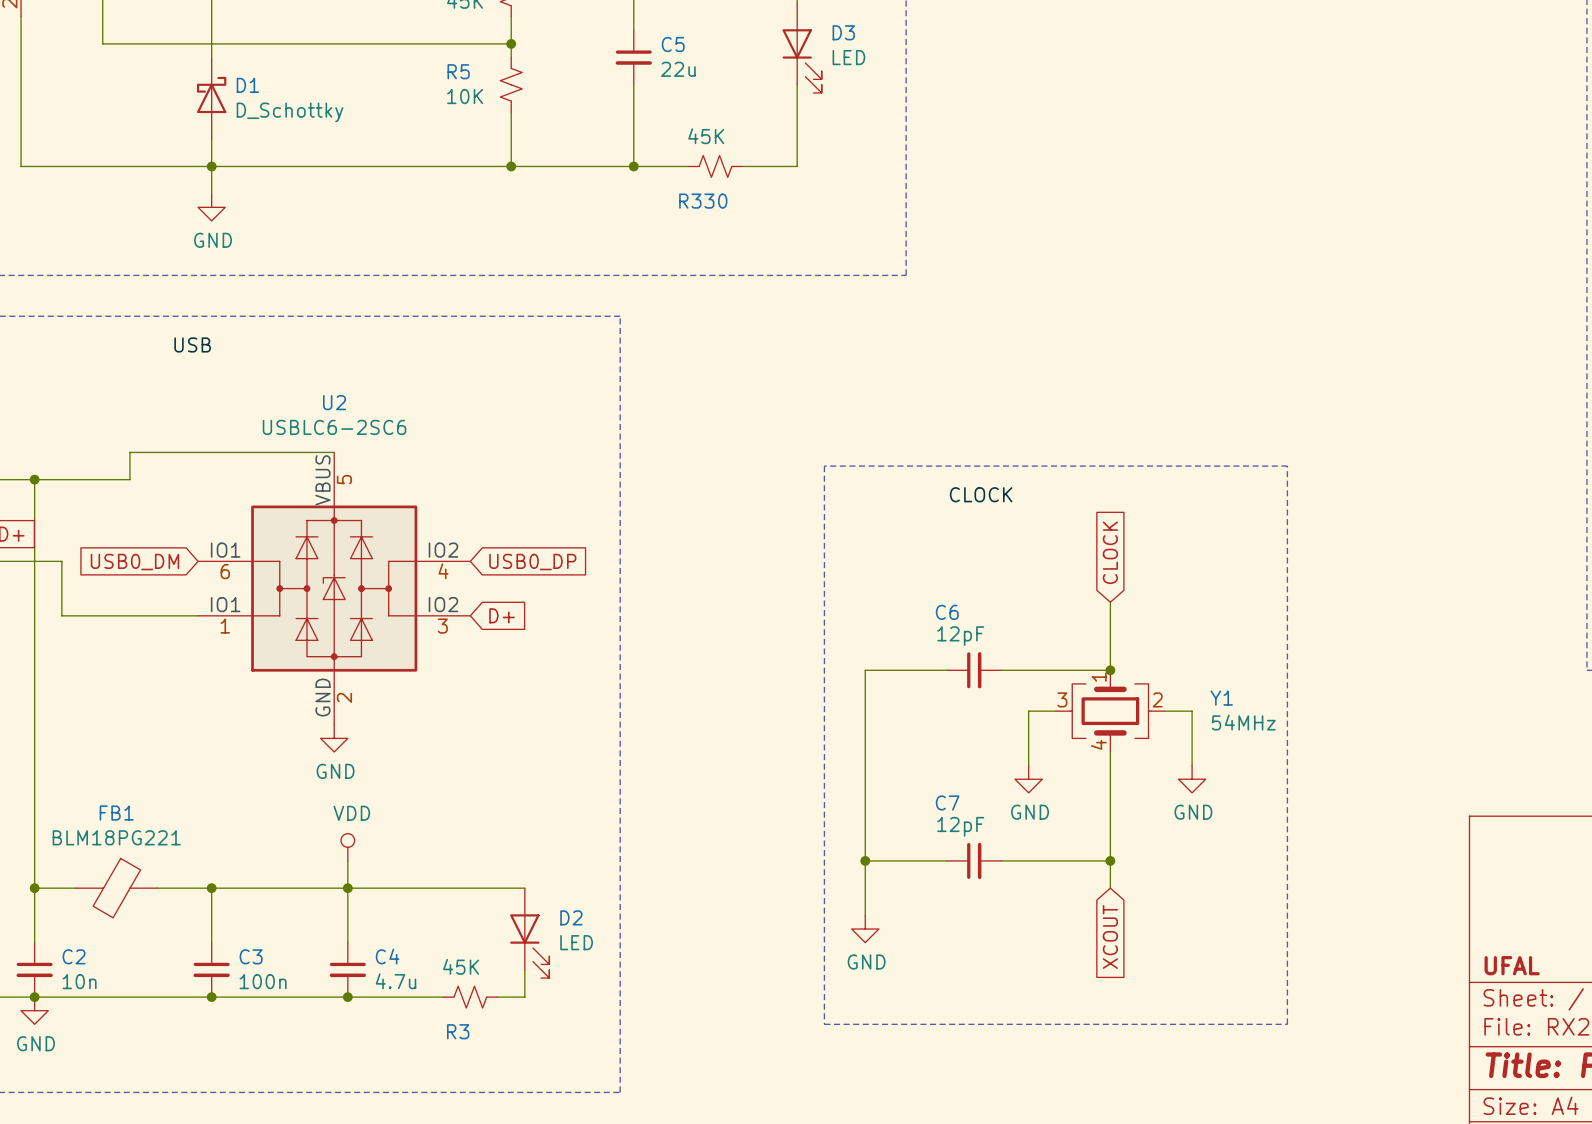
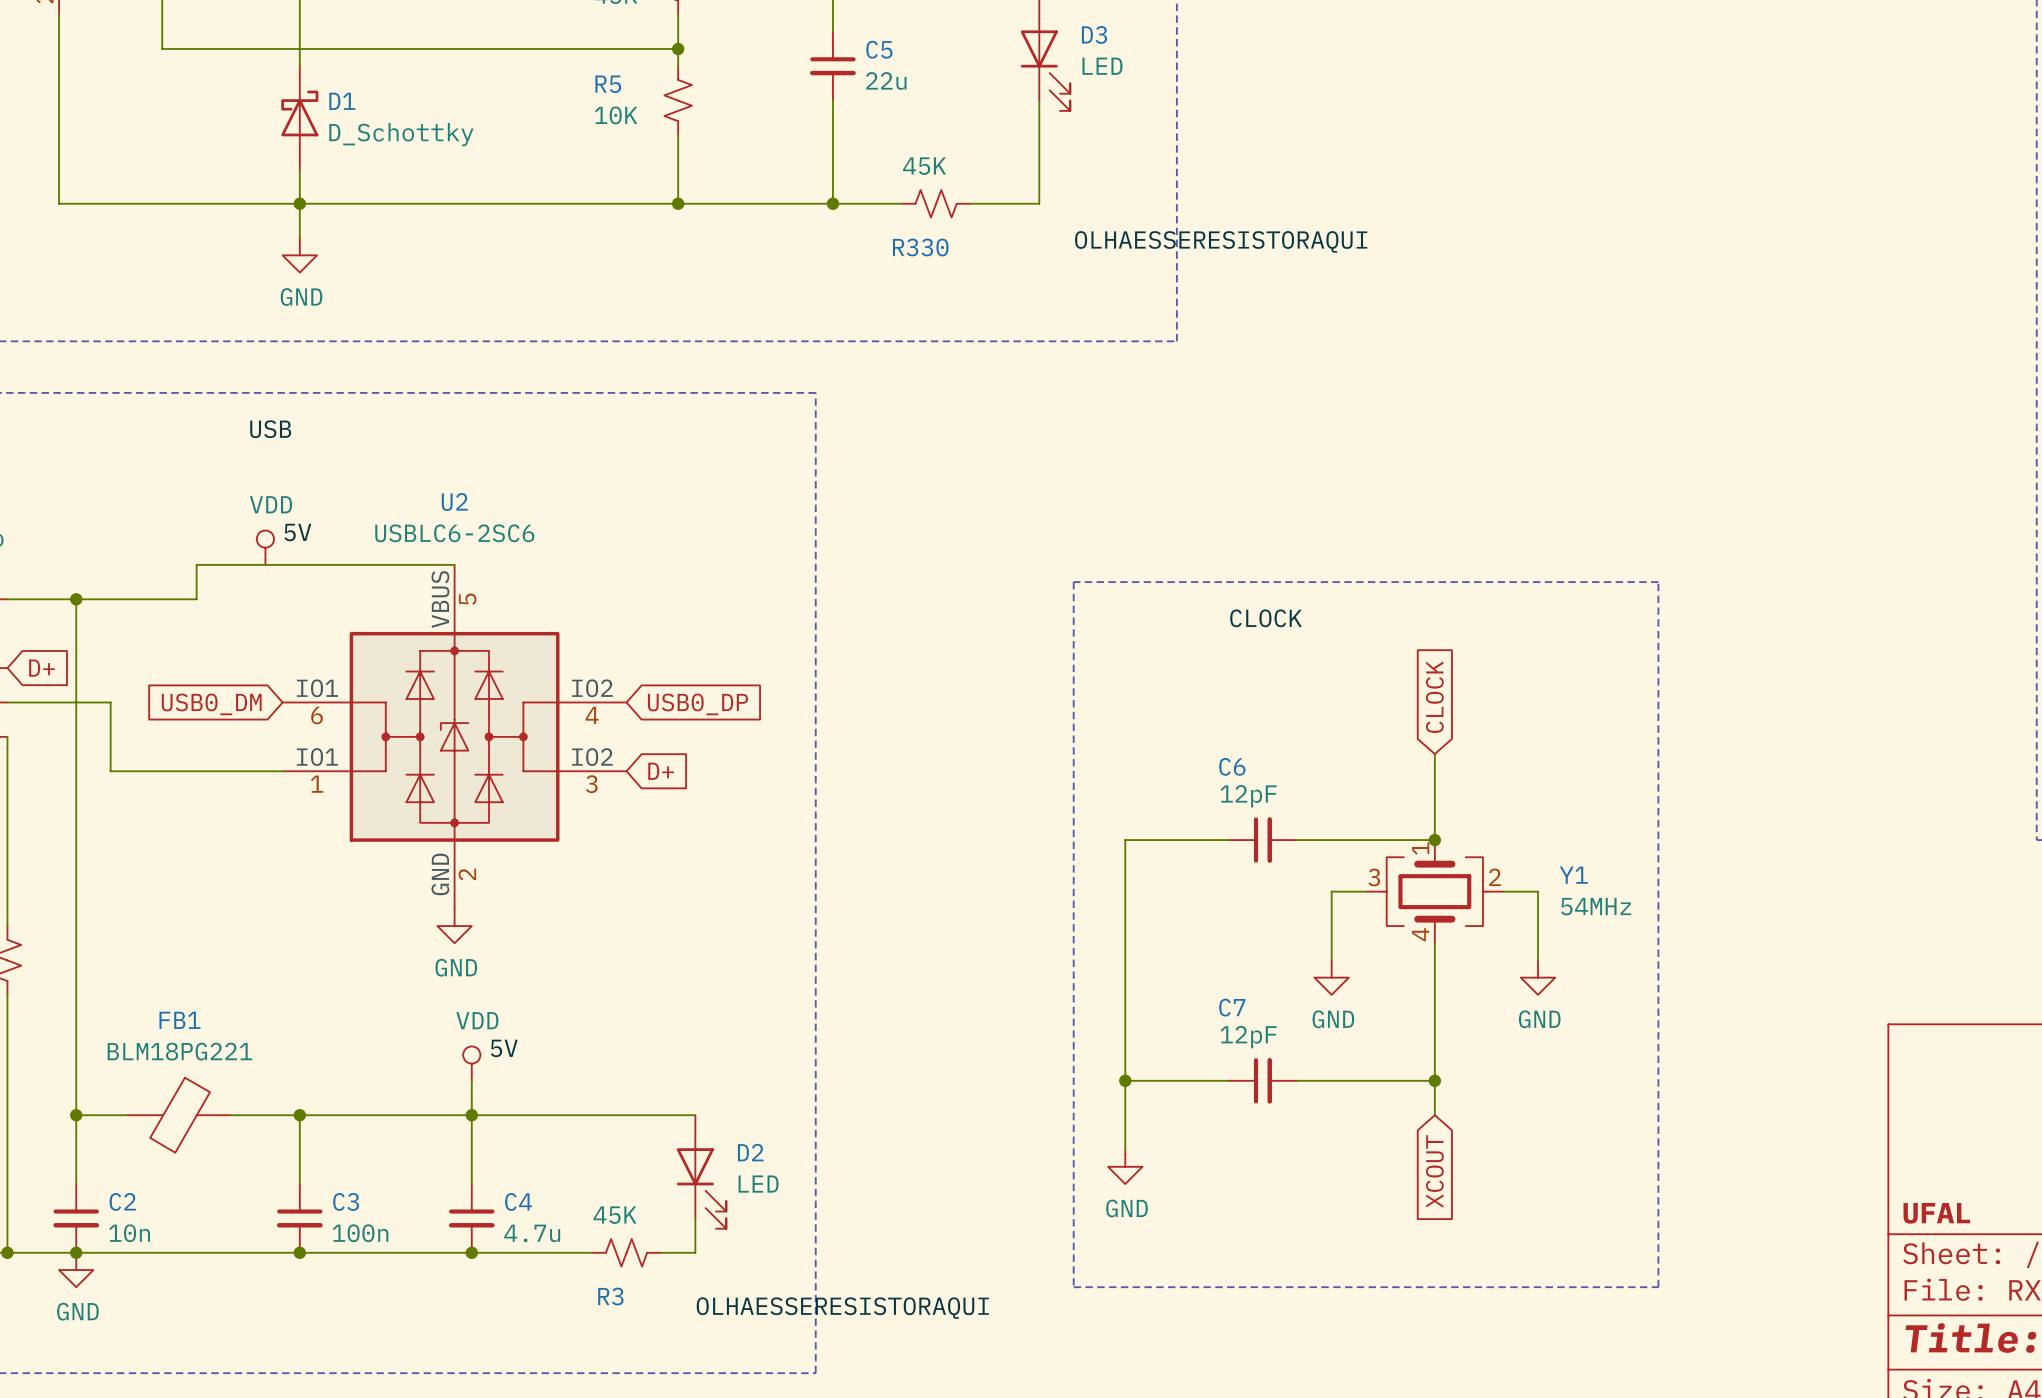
label: none -> OLHAESSERESISTORAQUI (1221, 241)
label: none -> 5V (297, 532)
power symbol: none -> VDD (265, 547)
label: none -> 5V (504, 1048)
label: none -> OLHAESSERESISTORAQUI (842, 1308)

